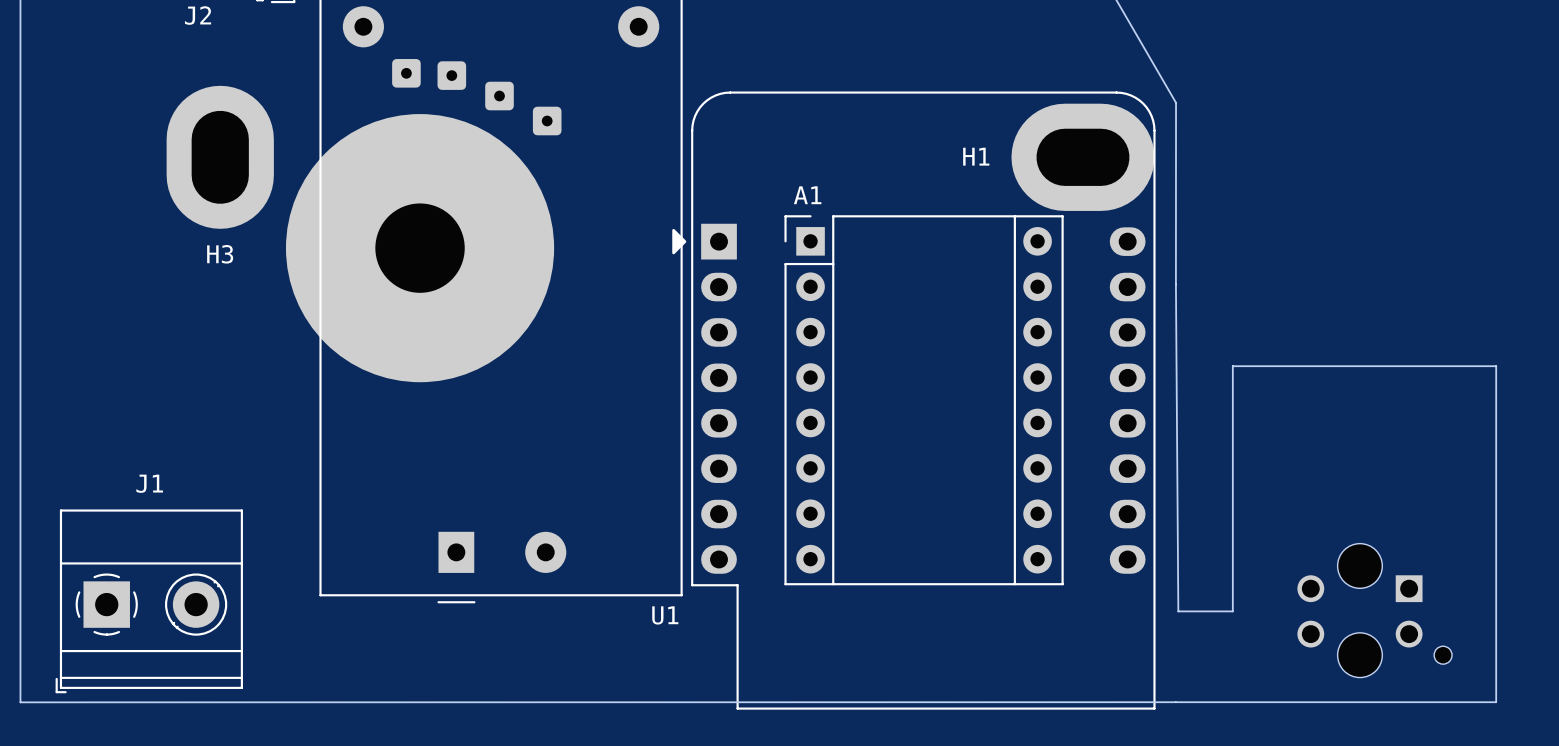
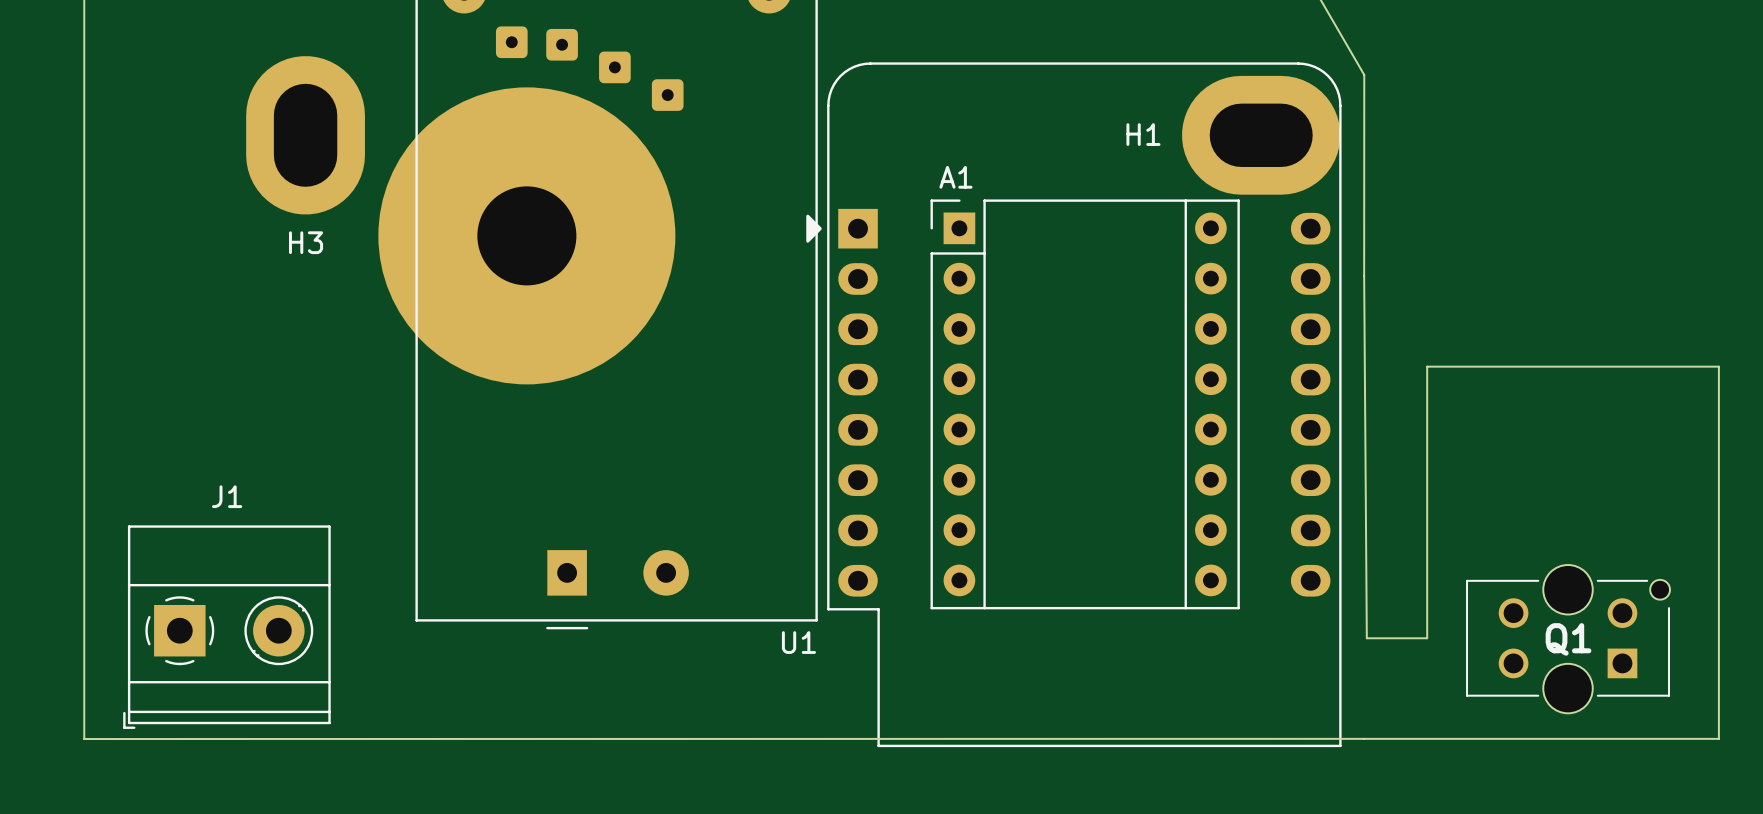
Q1 side: top (1374, 610) -> bottom (1568, 639)

